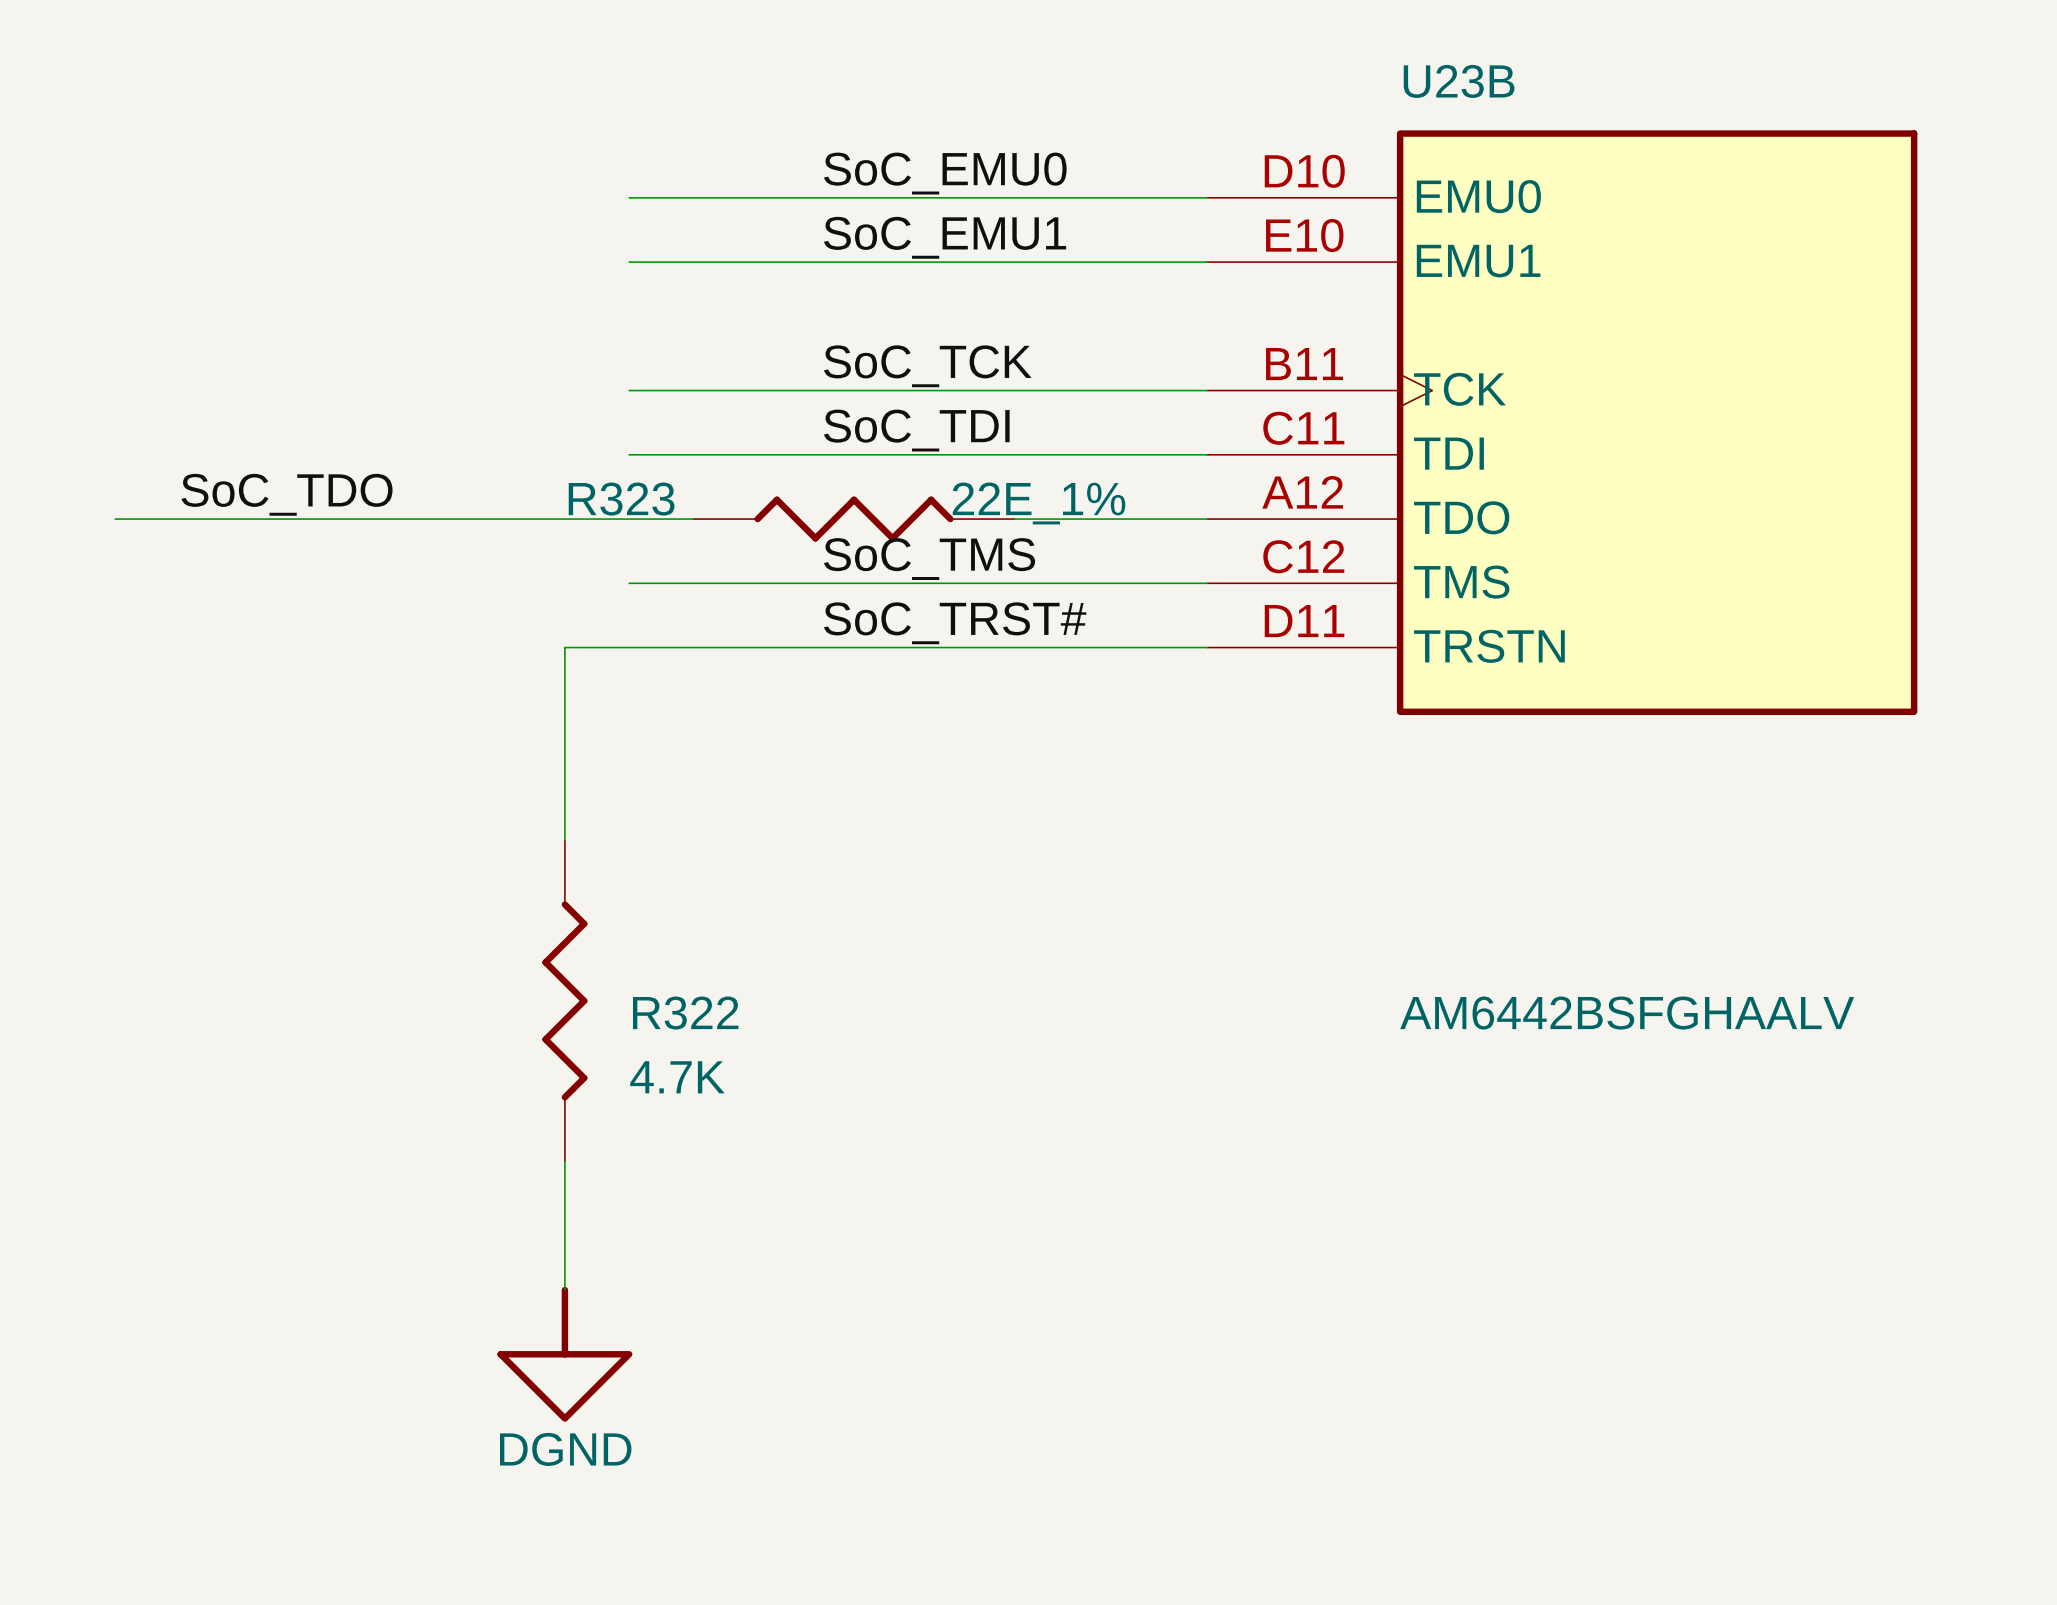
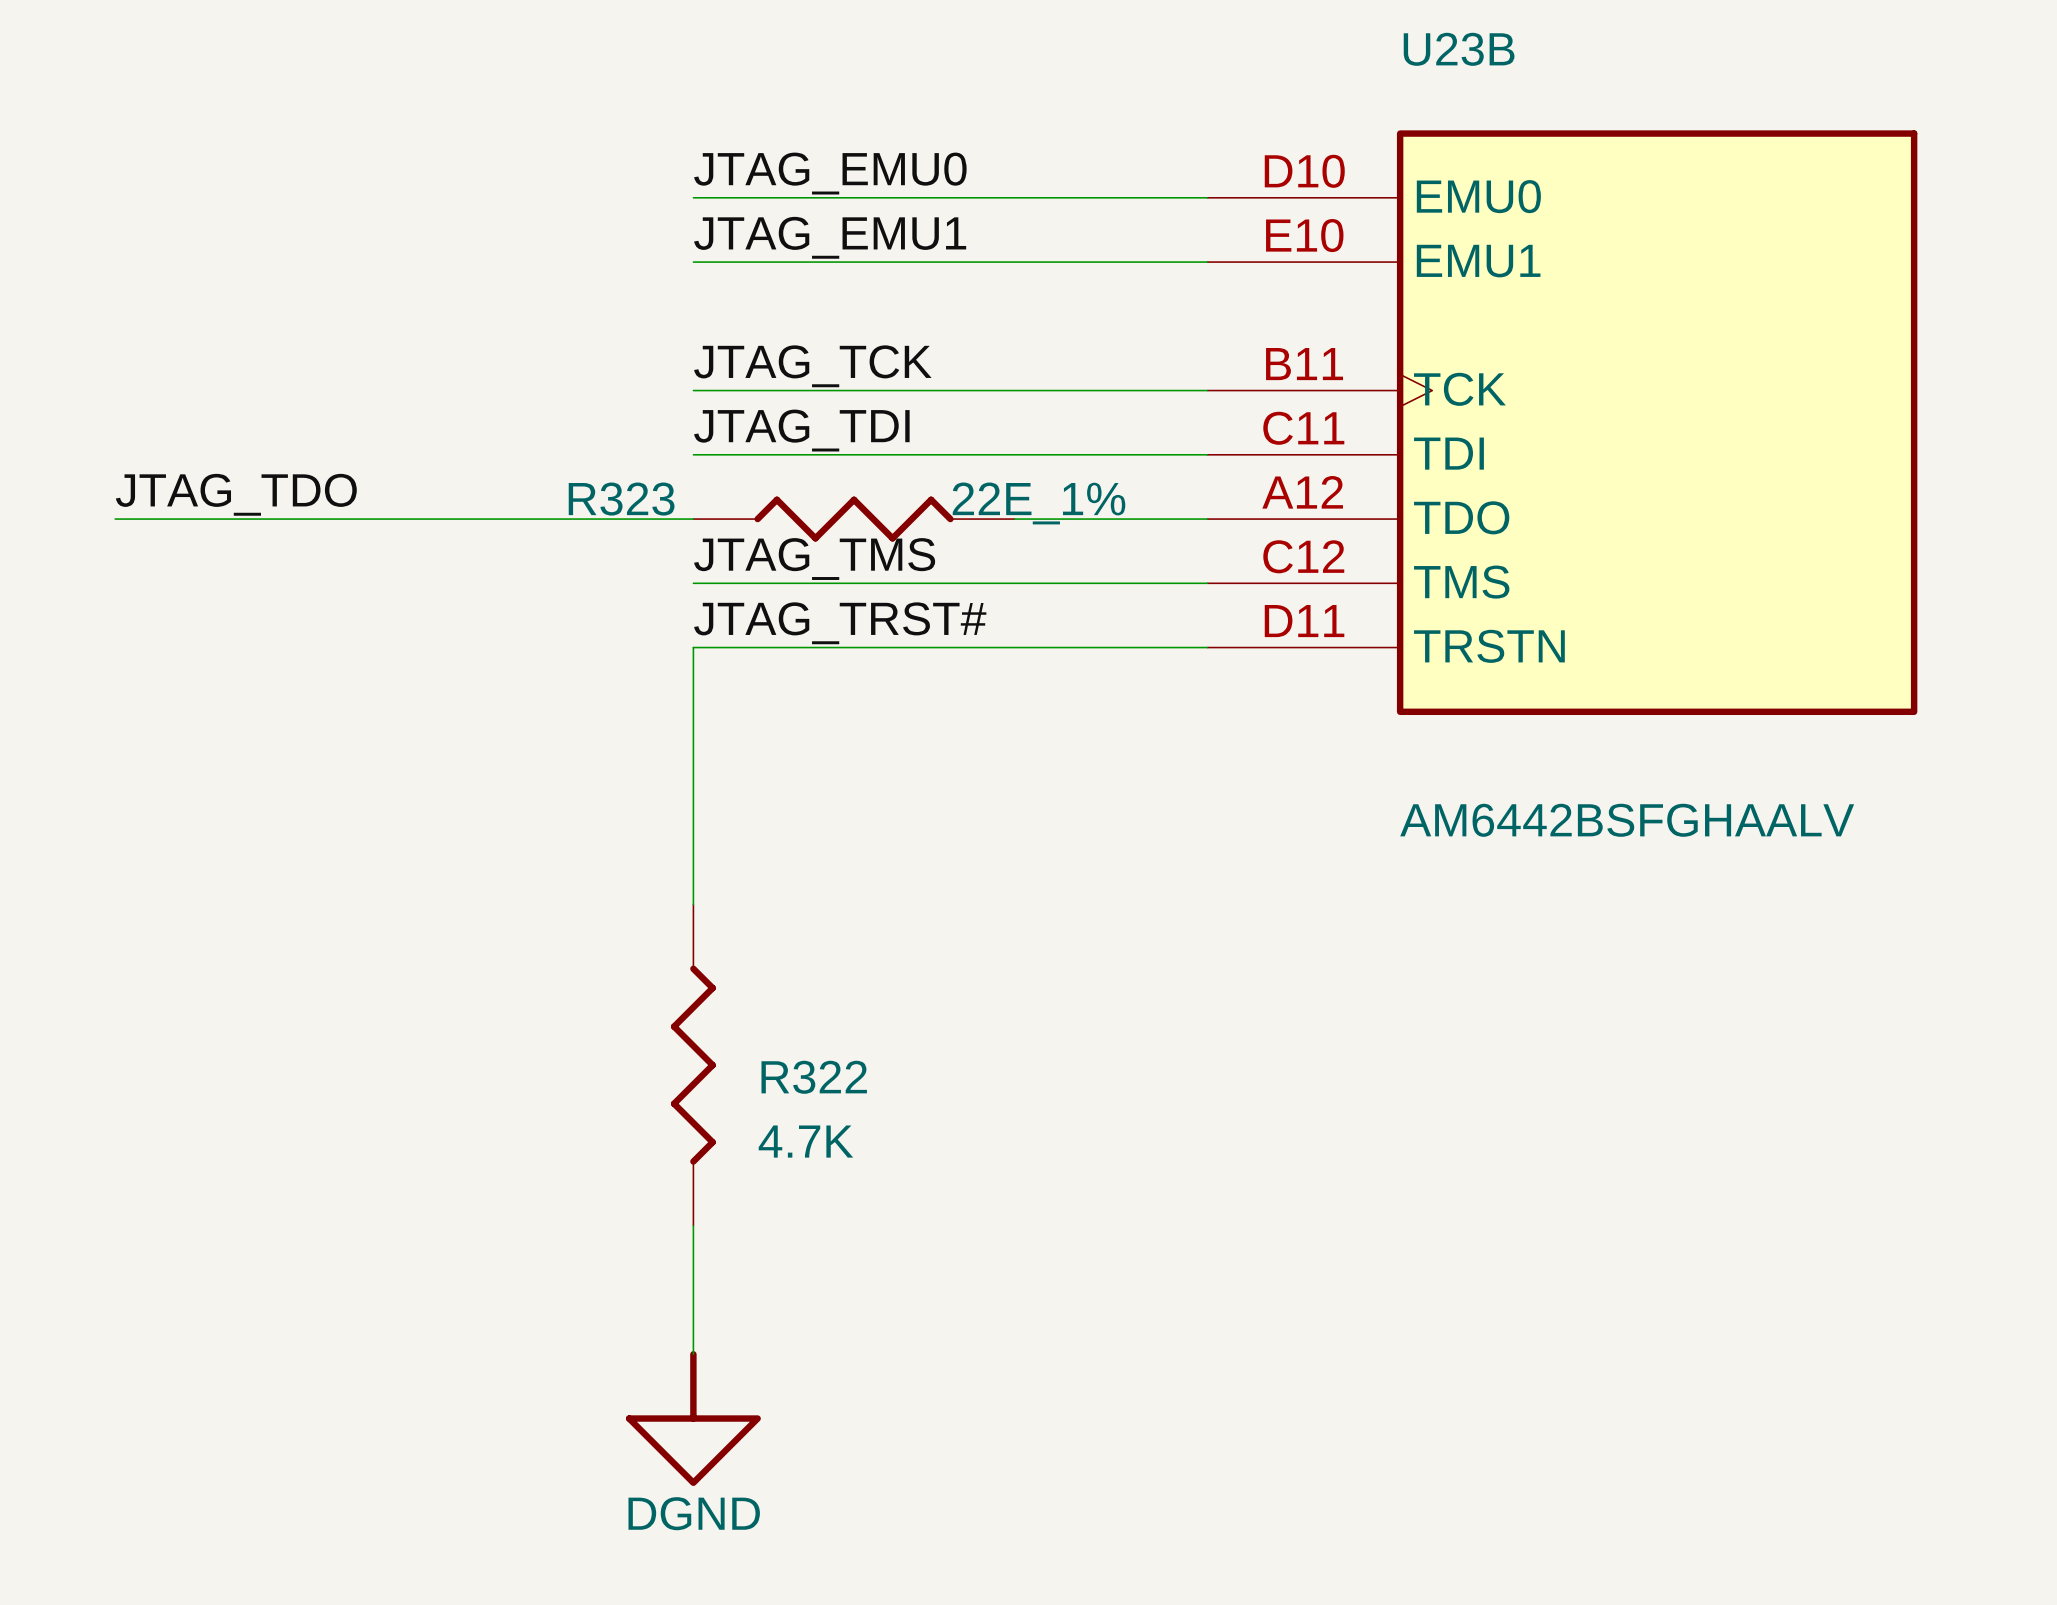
U23B name position: U23B (1459, 81) -> U23B (1459, 49)
label: none -> JTAG_EMU0 (830, 173)
label: SoC_EMU0 (945, 173) -> none
wire: (629, 197) (693, 197) -> none
label: none -> JTAG_EMU1 (830, 237)
label: SoC_EMU1 (945, 237) -> none
wire: (629, 262) (693, 262) -> none
label: none -> JTAG_TCK (812, 366)
label: SoC_TCK (927, 366) -> none
wire: (629, 390) (693, 390) -> none
label: none -> JTAG_TDI (801, 430)
label: SoC_TDI (916, 430) -> none
wire: (629, 454) (693, 454) -> none
label: none -> JTAG_TDO (236, 494)
label: SoC_TDO (287, 494) -> none
label: none -> JTAG_TMS (814, 559)
label: SoC_TMS (929, 559) -> none
wire: (629, 583) (693, 583) -> none
label: SoC_TRST# (955, 623) -> JTAG_TRST# (840, 623)
wire: (693, 647) (564, 647) (564, 840) -> (693, 647) (693, 904)
R322 position: (564, 1000) -> (693, 1065)
U23B value position: AM6442BSFGHAALV (1627, 1013) -> AM6442BSFGHAALV (1627, 820)
wire: (564, 1161) (564, 1290) -> (693, 1225) (693, 1354)
power symbol position: DGND (564, 1354) -> DGND (693, 1418)

